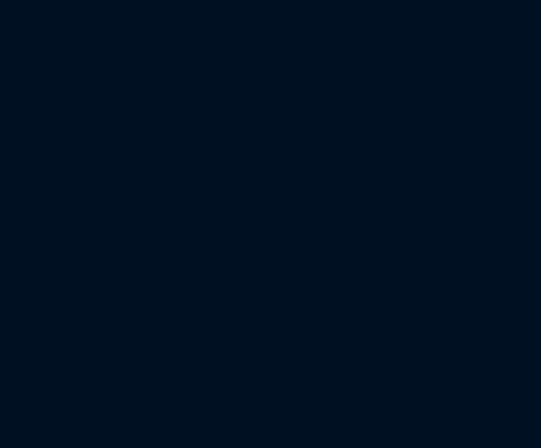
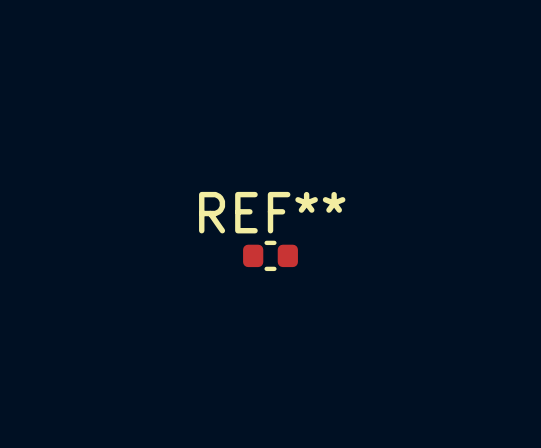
REF**: none -> (270, 255)

